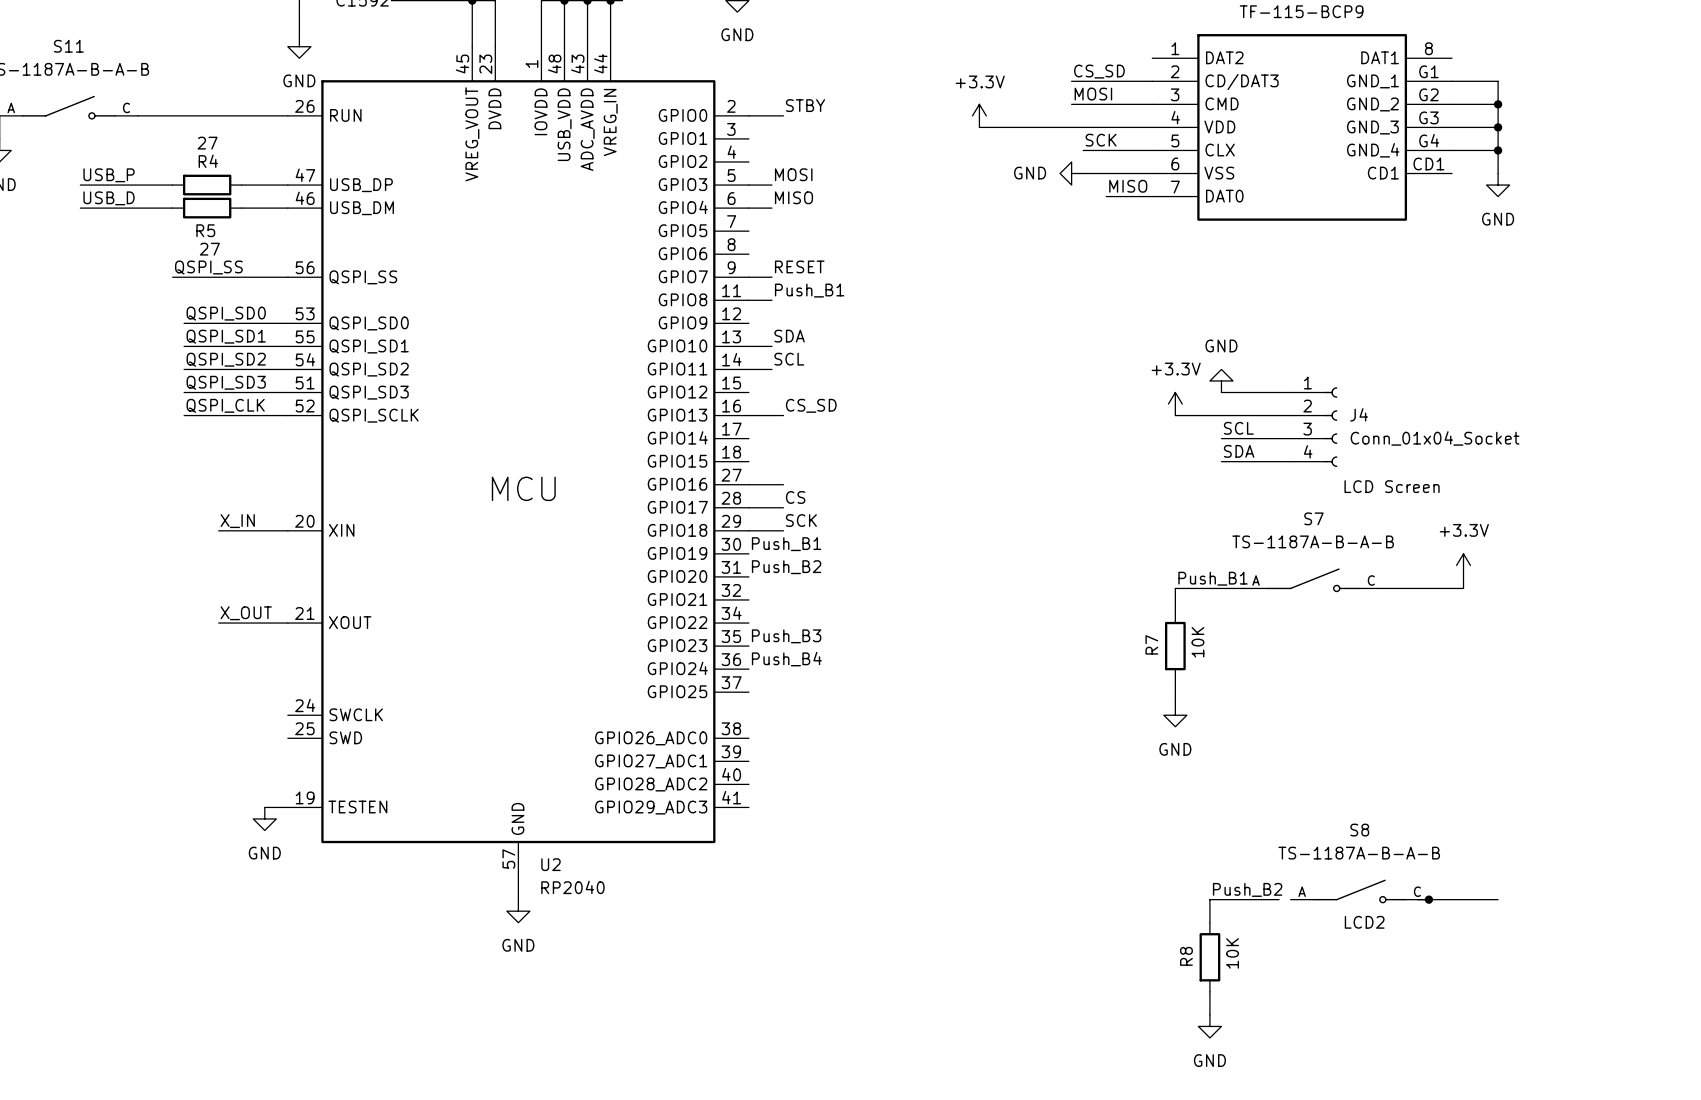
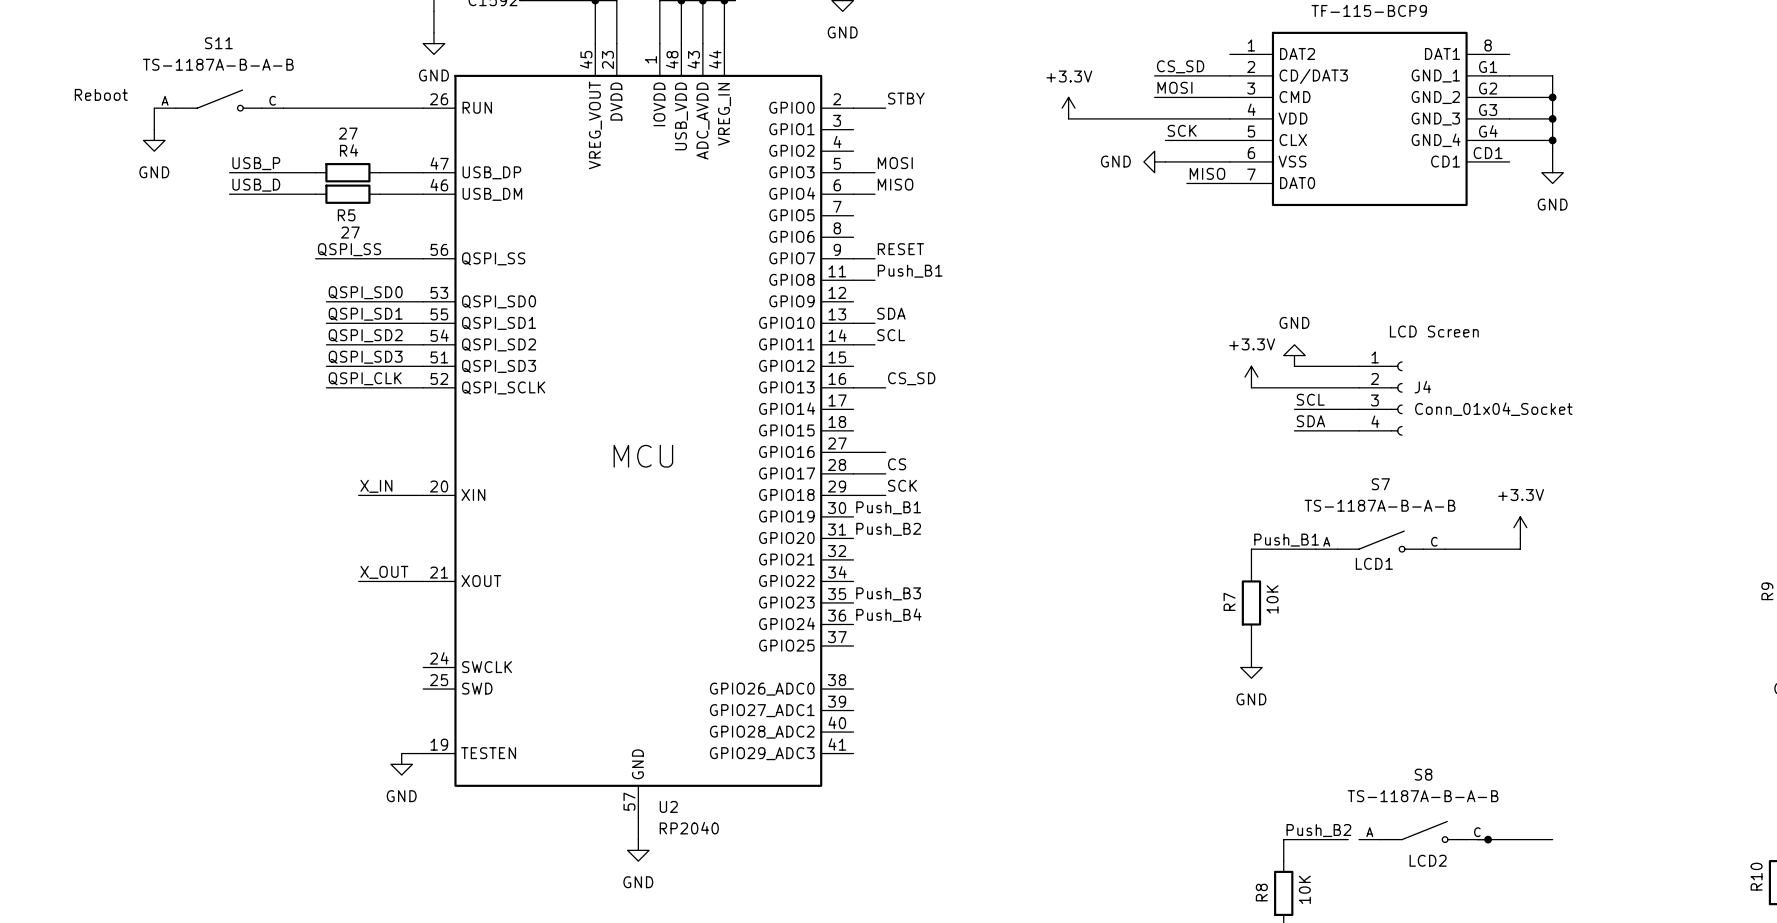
text position: LCD Screen (1392, 486) -> LCD Screen (1434, 331)
text: none -> LCD1 (1374, 563)

